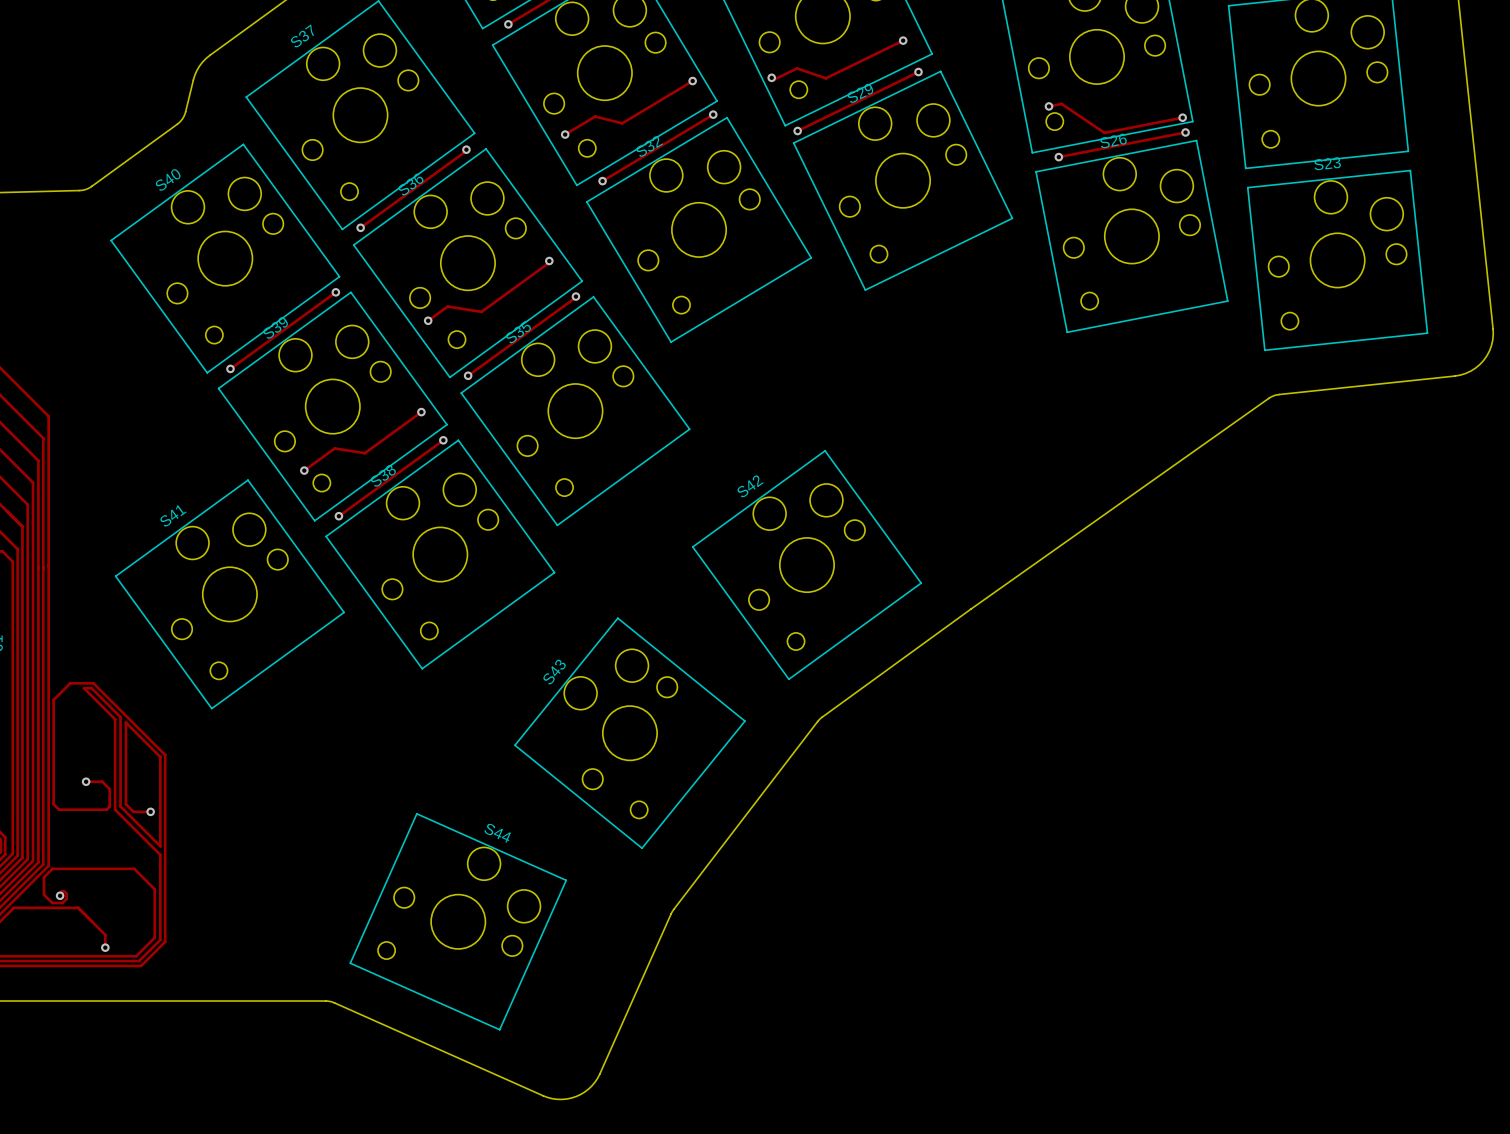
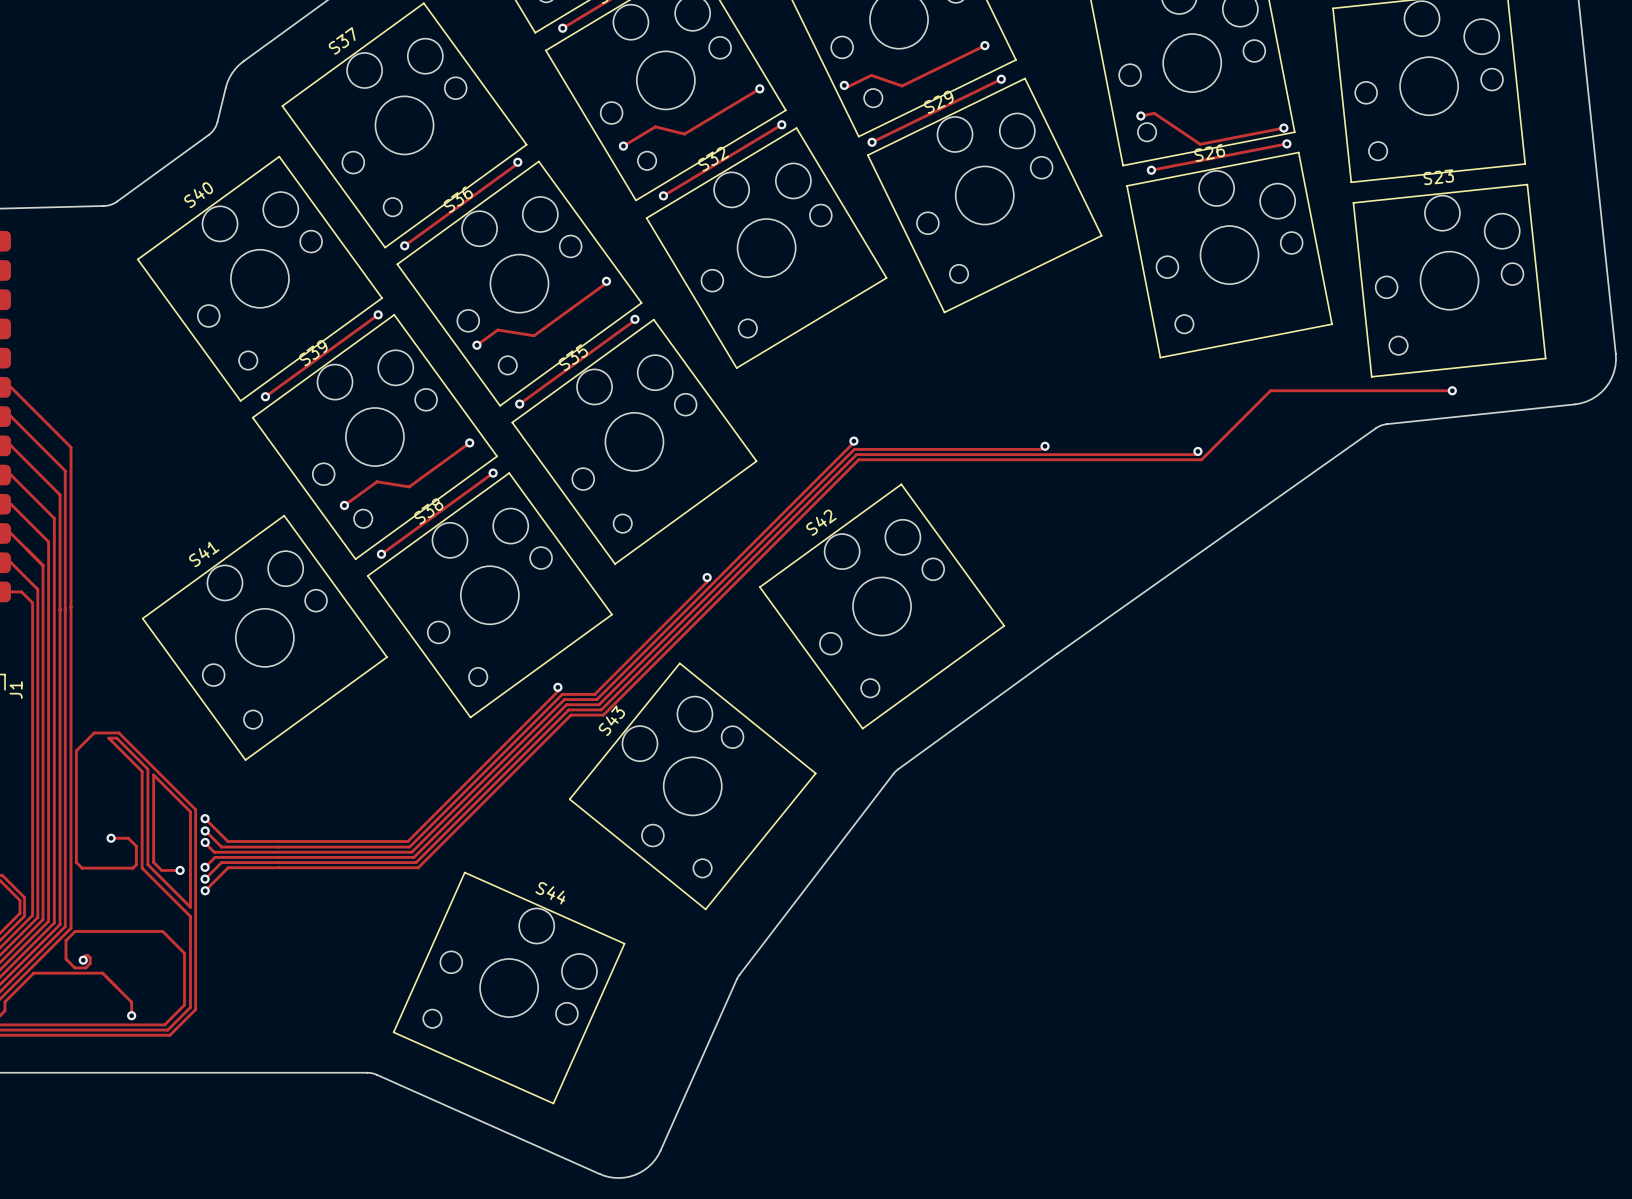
via: none -> (1452, 390)
track: none -> (1454, 390) (1270, 390) (1201, 459) (858, 459) (603, 715) (570, 715) (418, 867) (228, 867) (205, 890)
track: none -> (853, 441) (596, 699) (564, 699) (411, 852) (214, 852) (204, 842)
via: none -> (853, 441)
track: none -> (1045, 446) (1040, 449) (854, 449) (599, 704) (566, 704) (413, 857) (214, 857) (205, 867)
via: none -> (1045, 446)
track: none -> (1197, 451) (1195, 454) (856, 454) (601, 709) (568, 709) (416, 862) (221, 862) (205, 879)
via: none -> (1197, 451)
track: none -> (707, 577) (706, 582) (594, 694) (562, 694) (409, 847) (221, 847) (205, 830)
via: none -> (707, 577)
track: none -> (557, 687) (560, 688) (407, 841) (227, 841) (205, 818)
via: none -> (557, 687)
via: none -> (205, 818)
via: none -> (205, 830)
via: none -> (205, 842)
via: none -> (205, 867)
via: none -> (205, 879)
via: none -> (205, 890)

